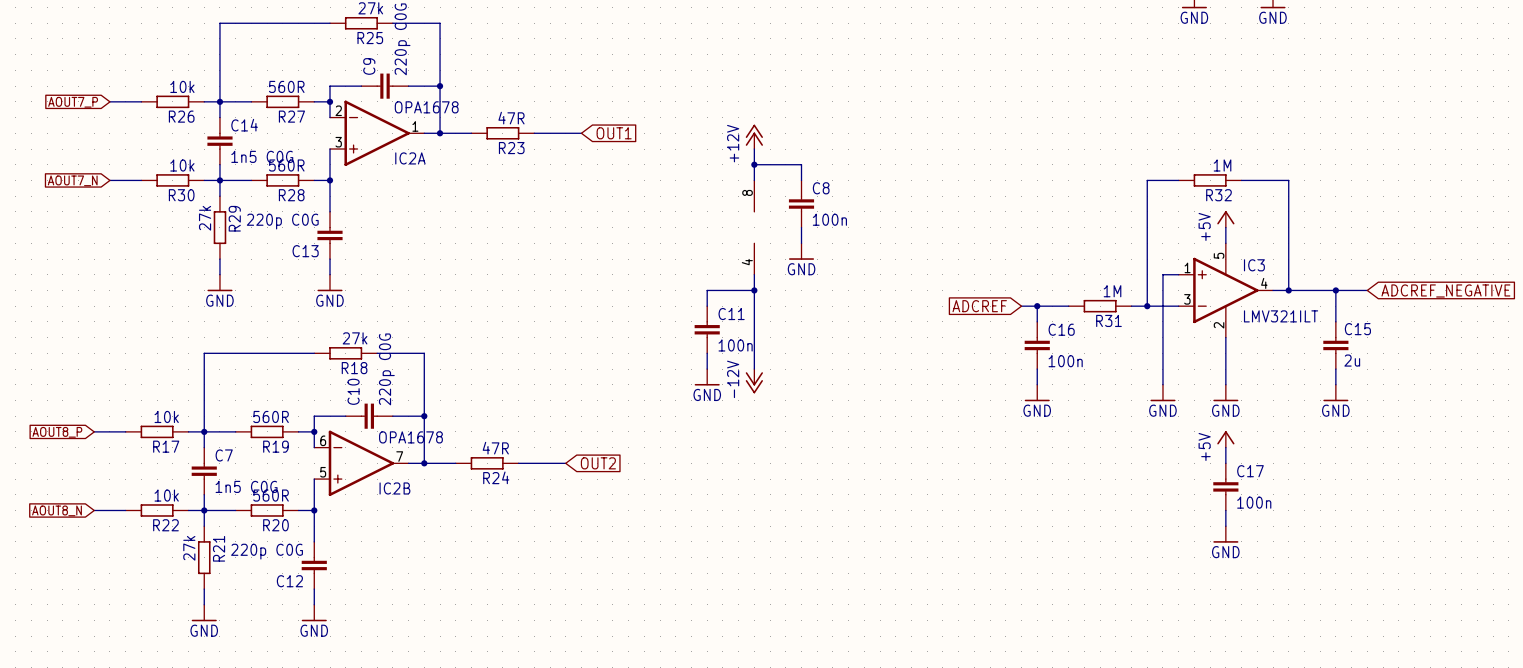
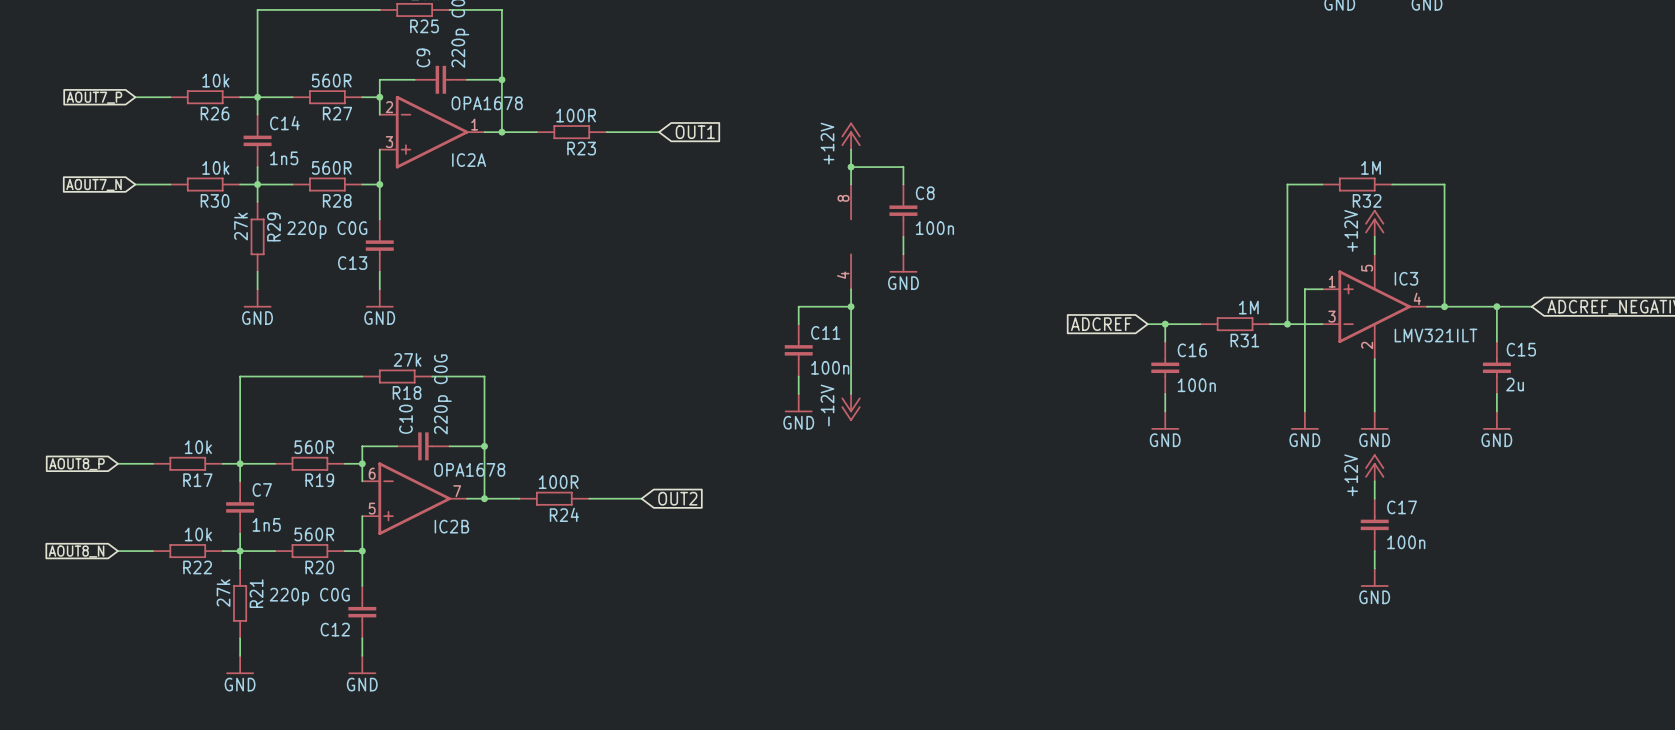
R23 value: 47R (511, 118) -> 100R (576, 115)
C14 value: 1n5 C0G (262, 156) -> 1n5 (284, 158)
power symbol: +5V (1225, 219) -> +12V (1374, 223)
power symbol: +5V (1225, 439) -> +12V (1374, 467)
R24 value: 47R (495, 448) -> 100R (558, 482)
C7 value: 1n5 C0G (246, 486) -> 1n5 (266, 524)

